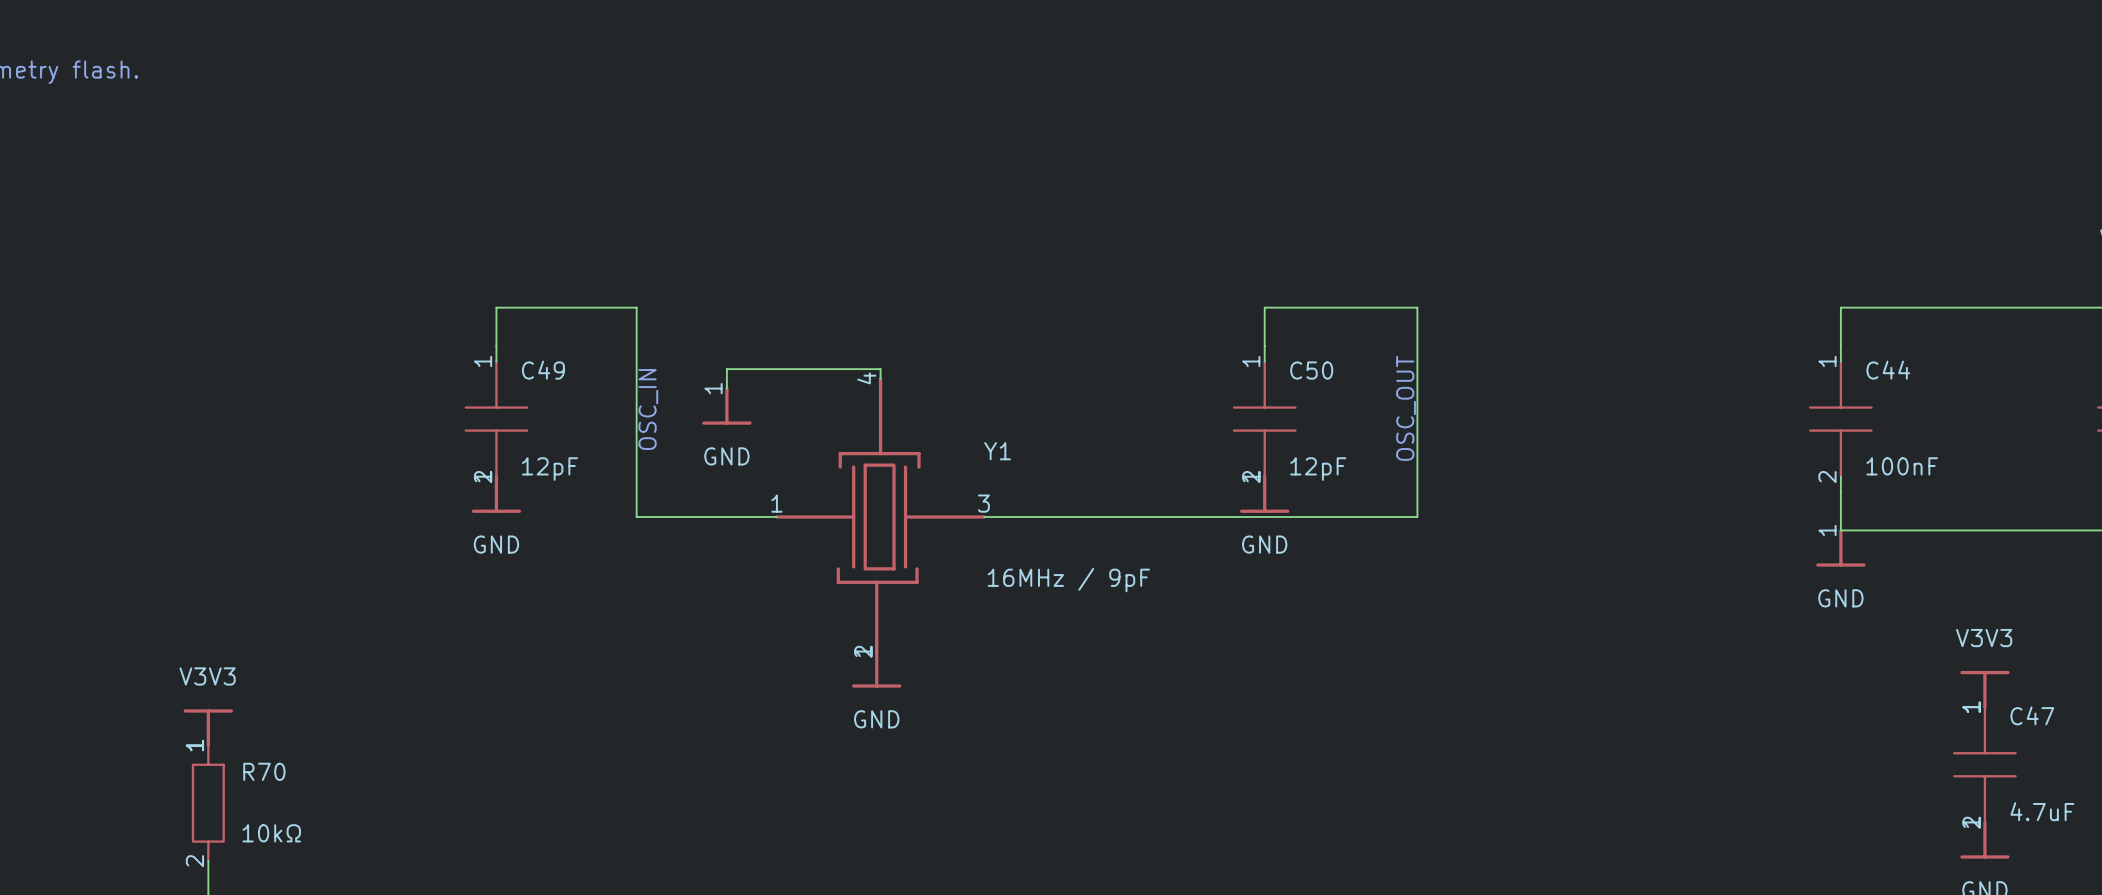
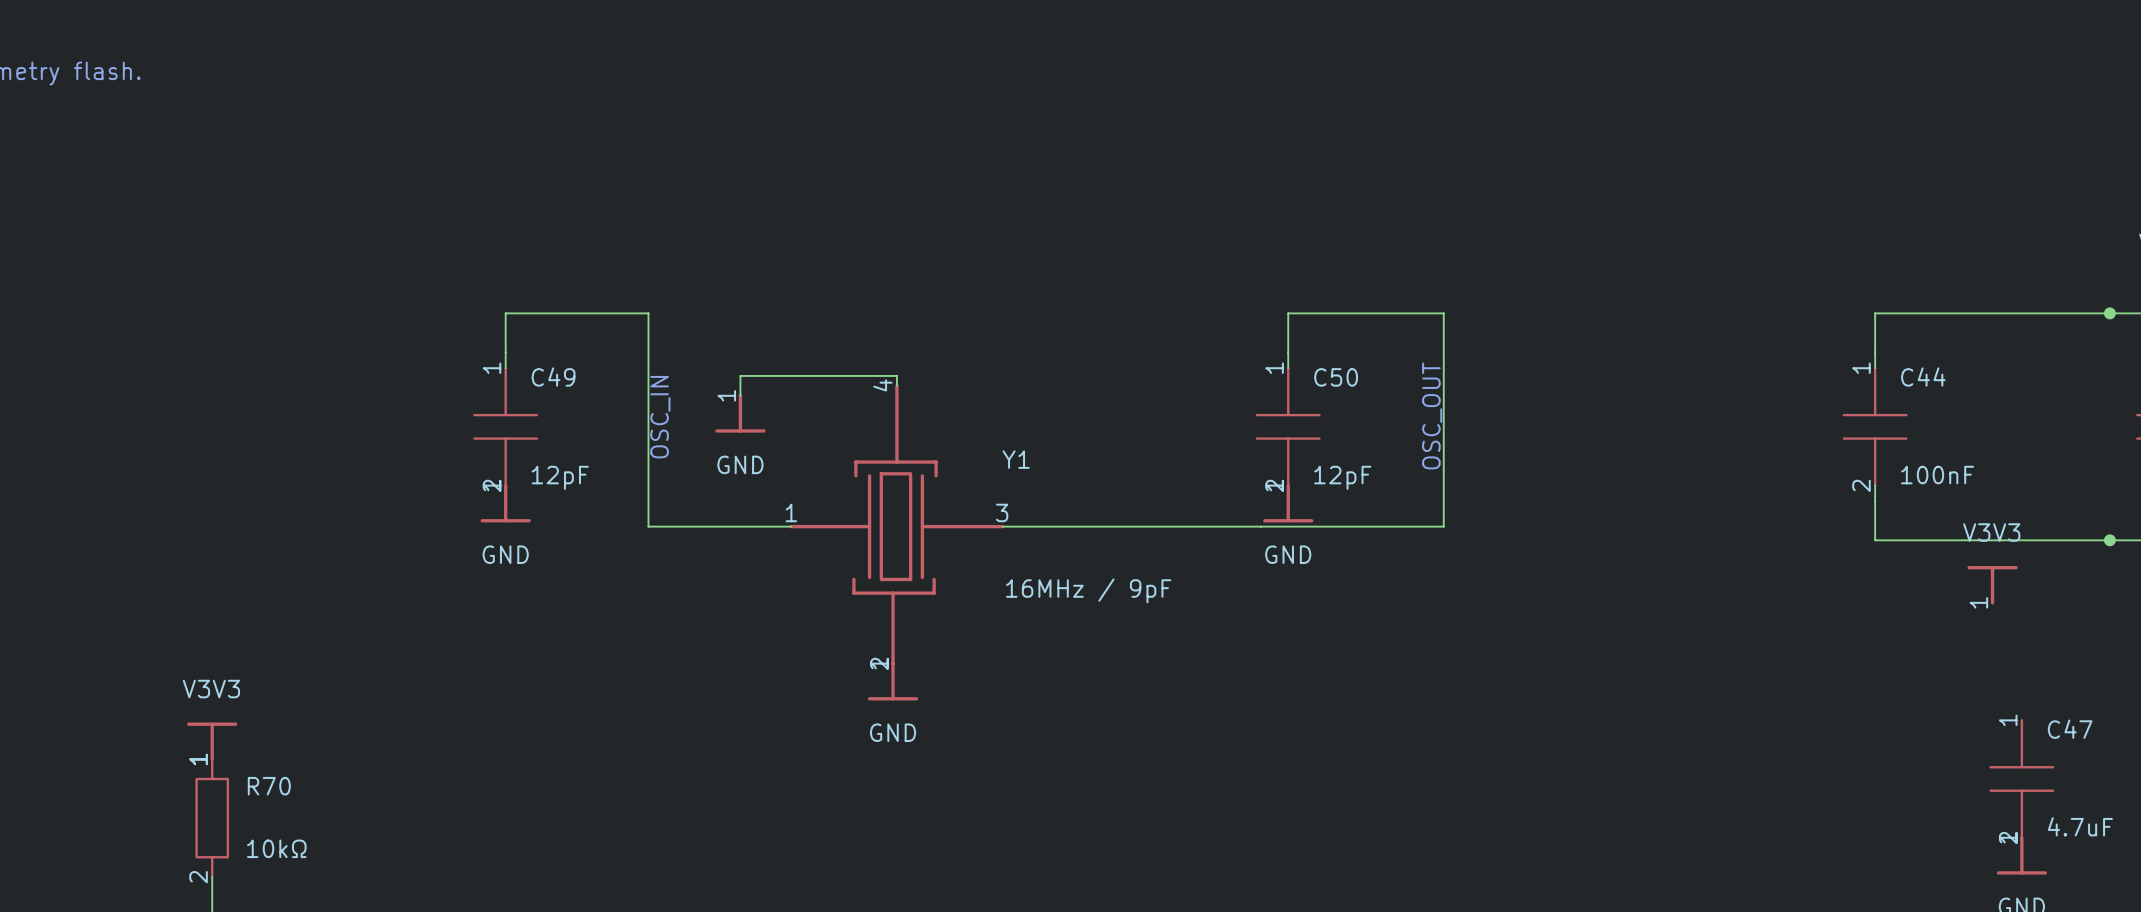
junction: none -> (2109, 313)
junction: none -> (2109, 540)
GND: (1840, 547) -> none
V3V3 position: (1984, 689) -> (1992, 585)

